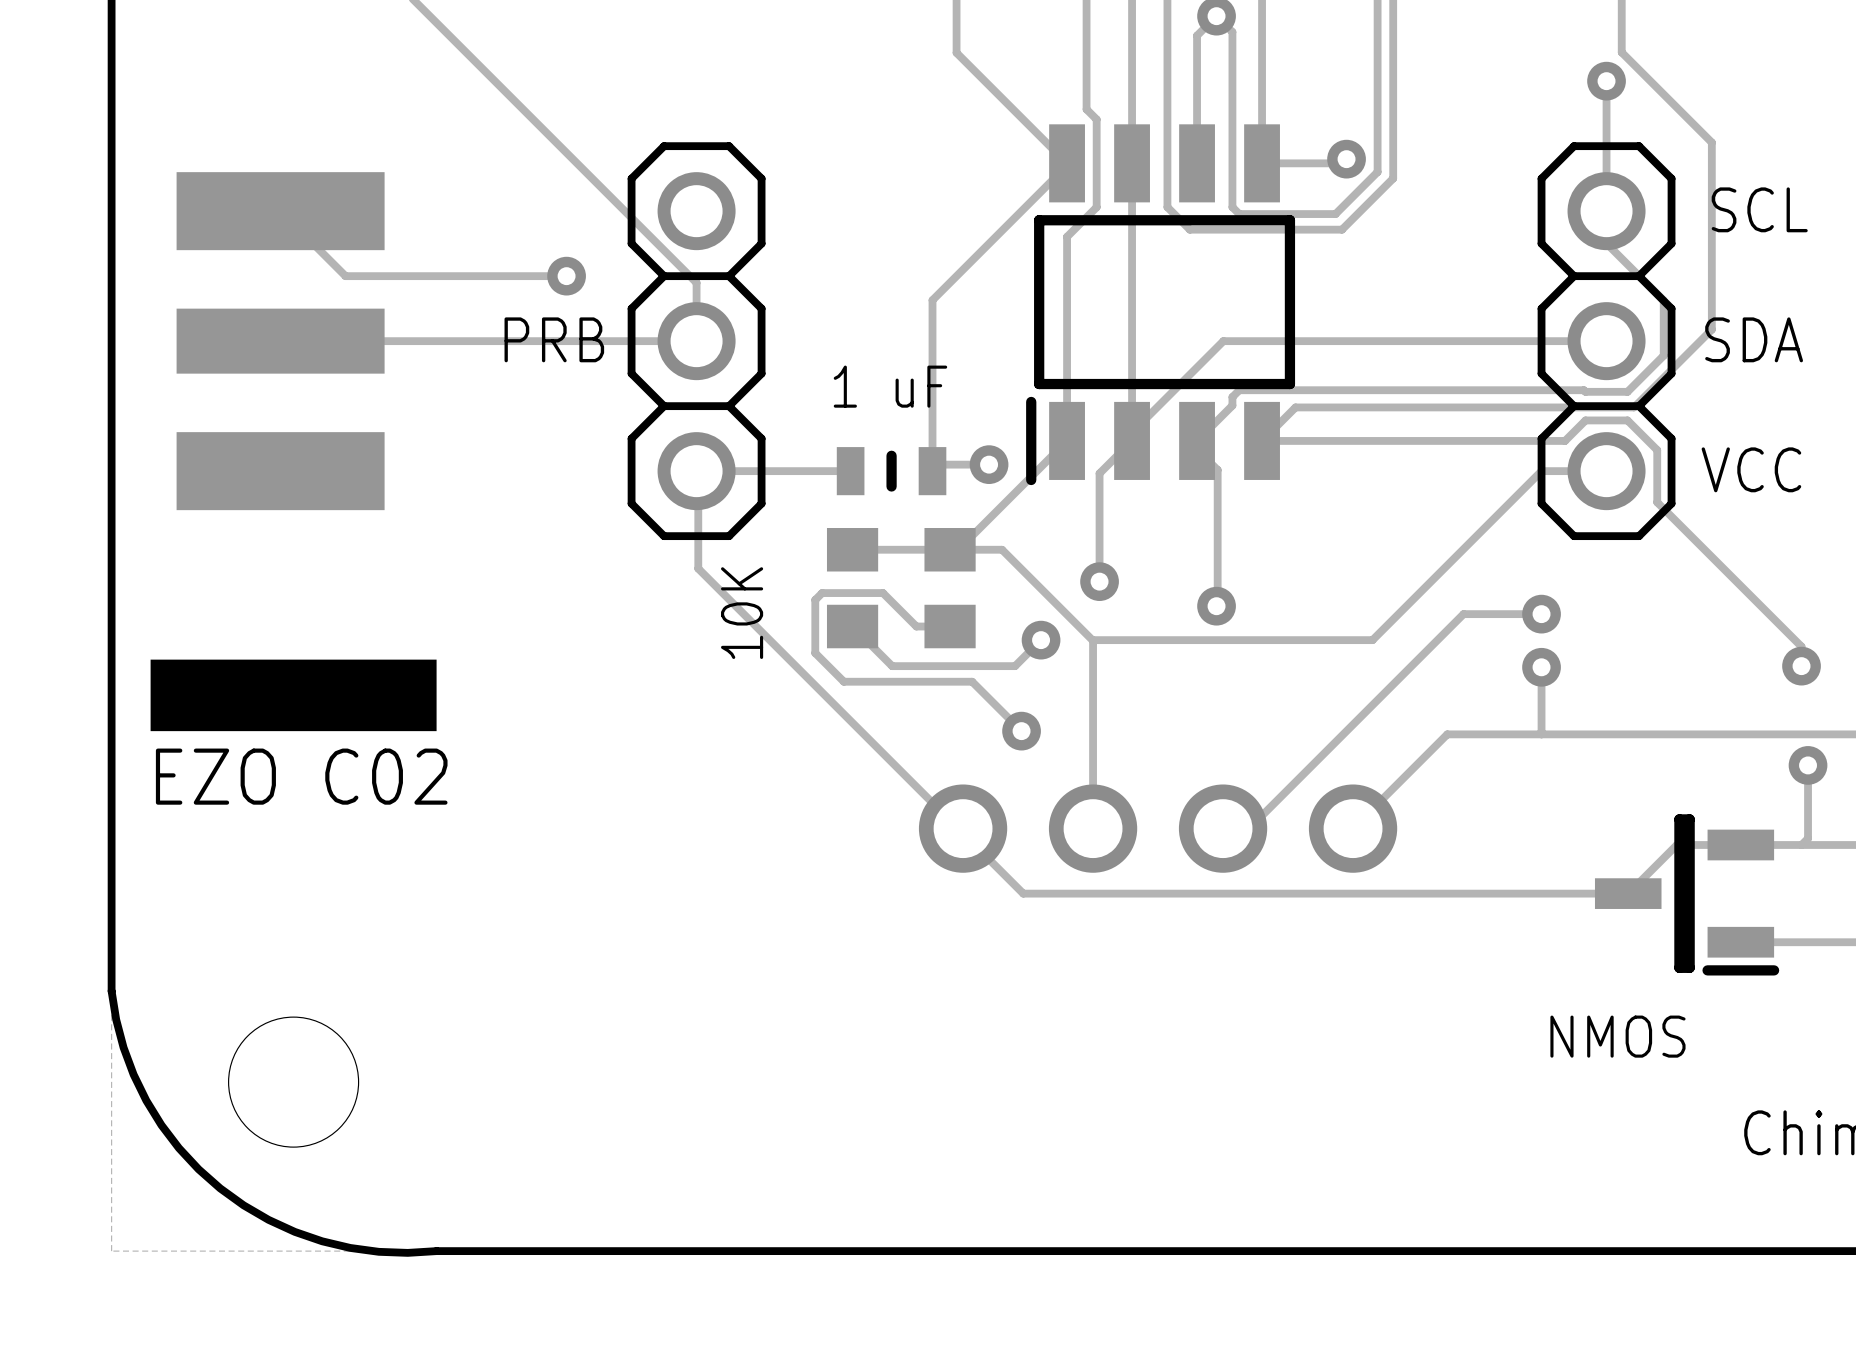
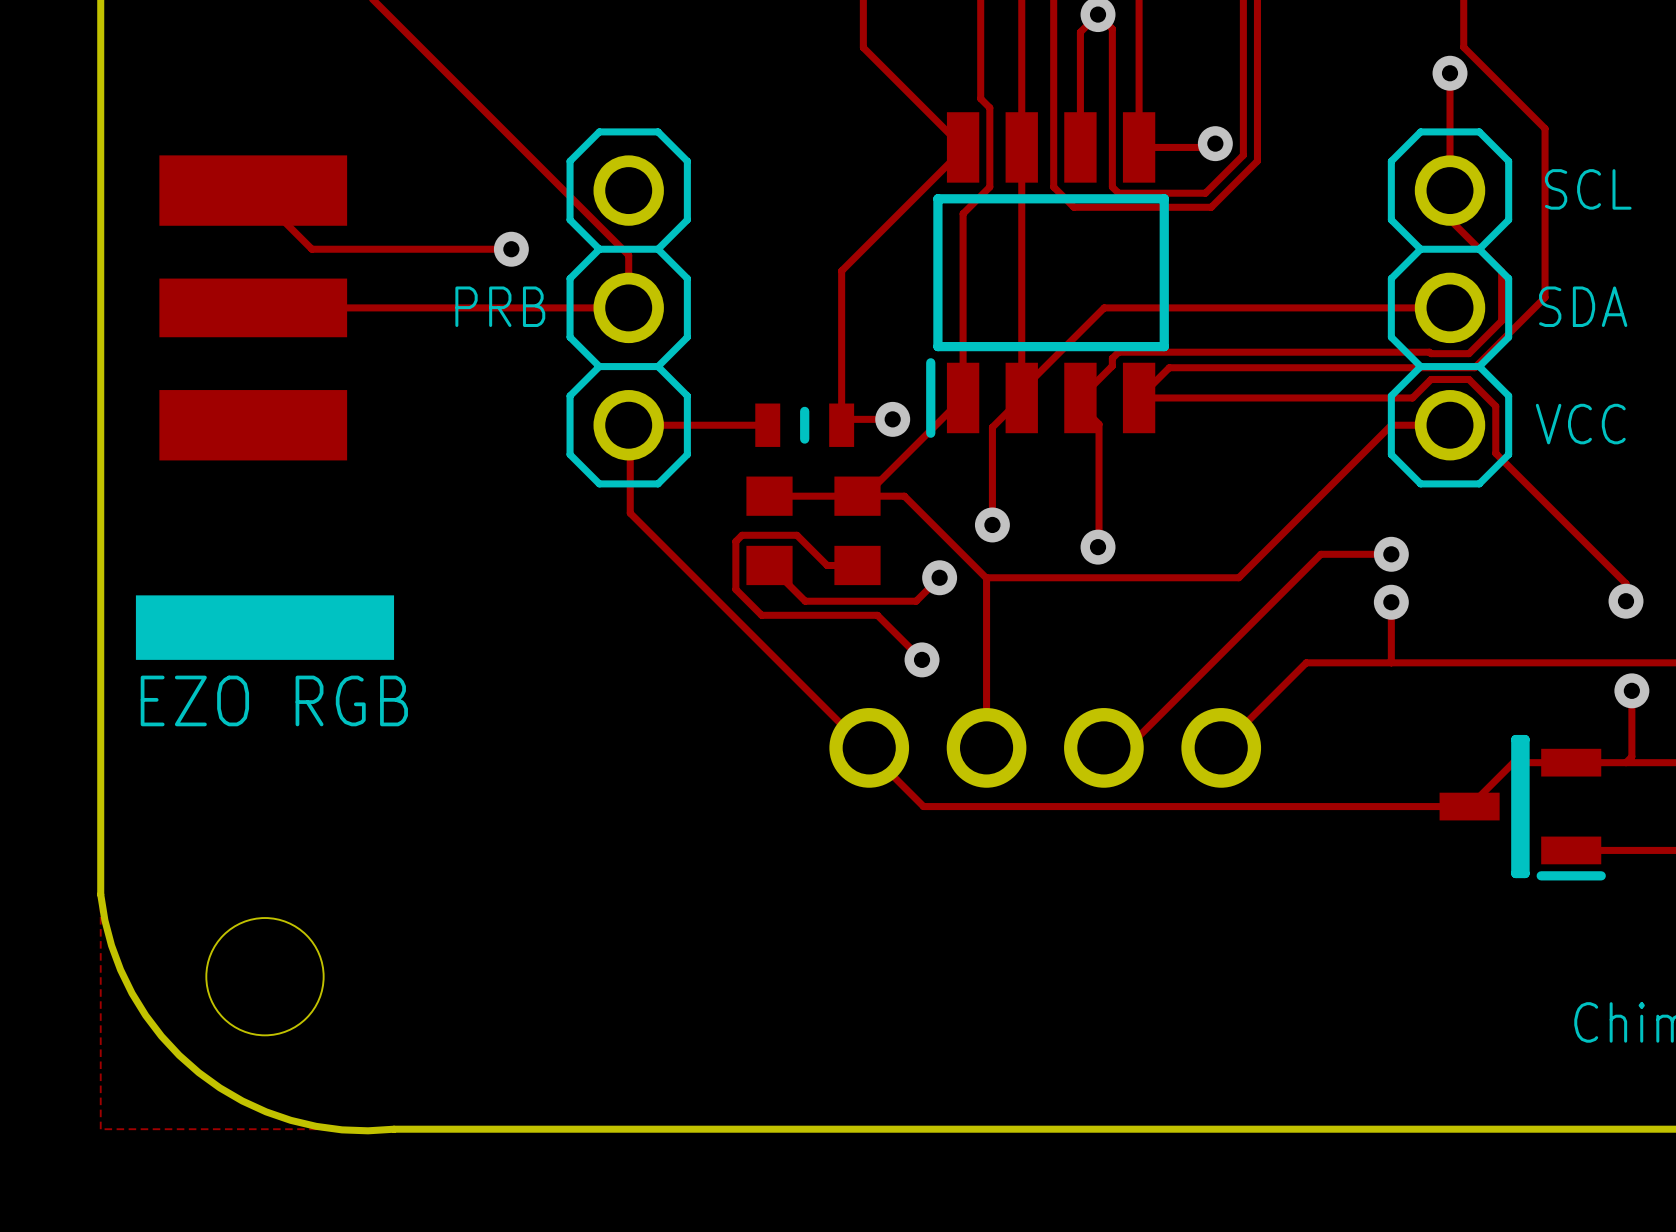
text: 1 uF (890, 386) -> none
text: 10K (742, 613) -> none
text: EZO C02 (301, 776) -> EZO RGB (274, 700)
text: NMOS (1617, 1036) -> none

